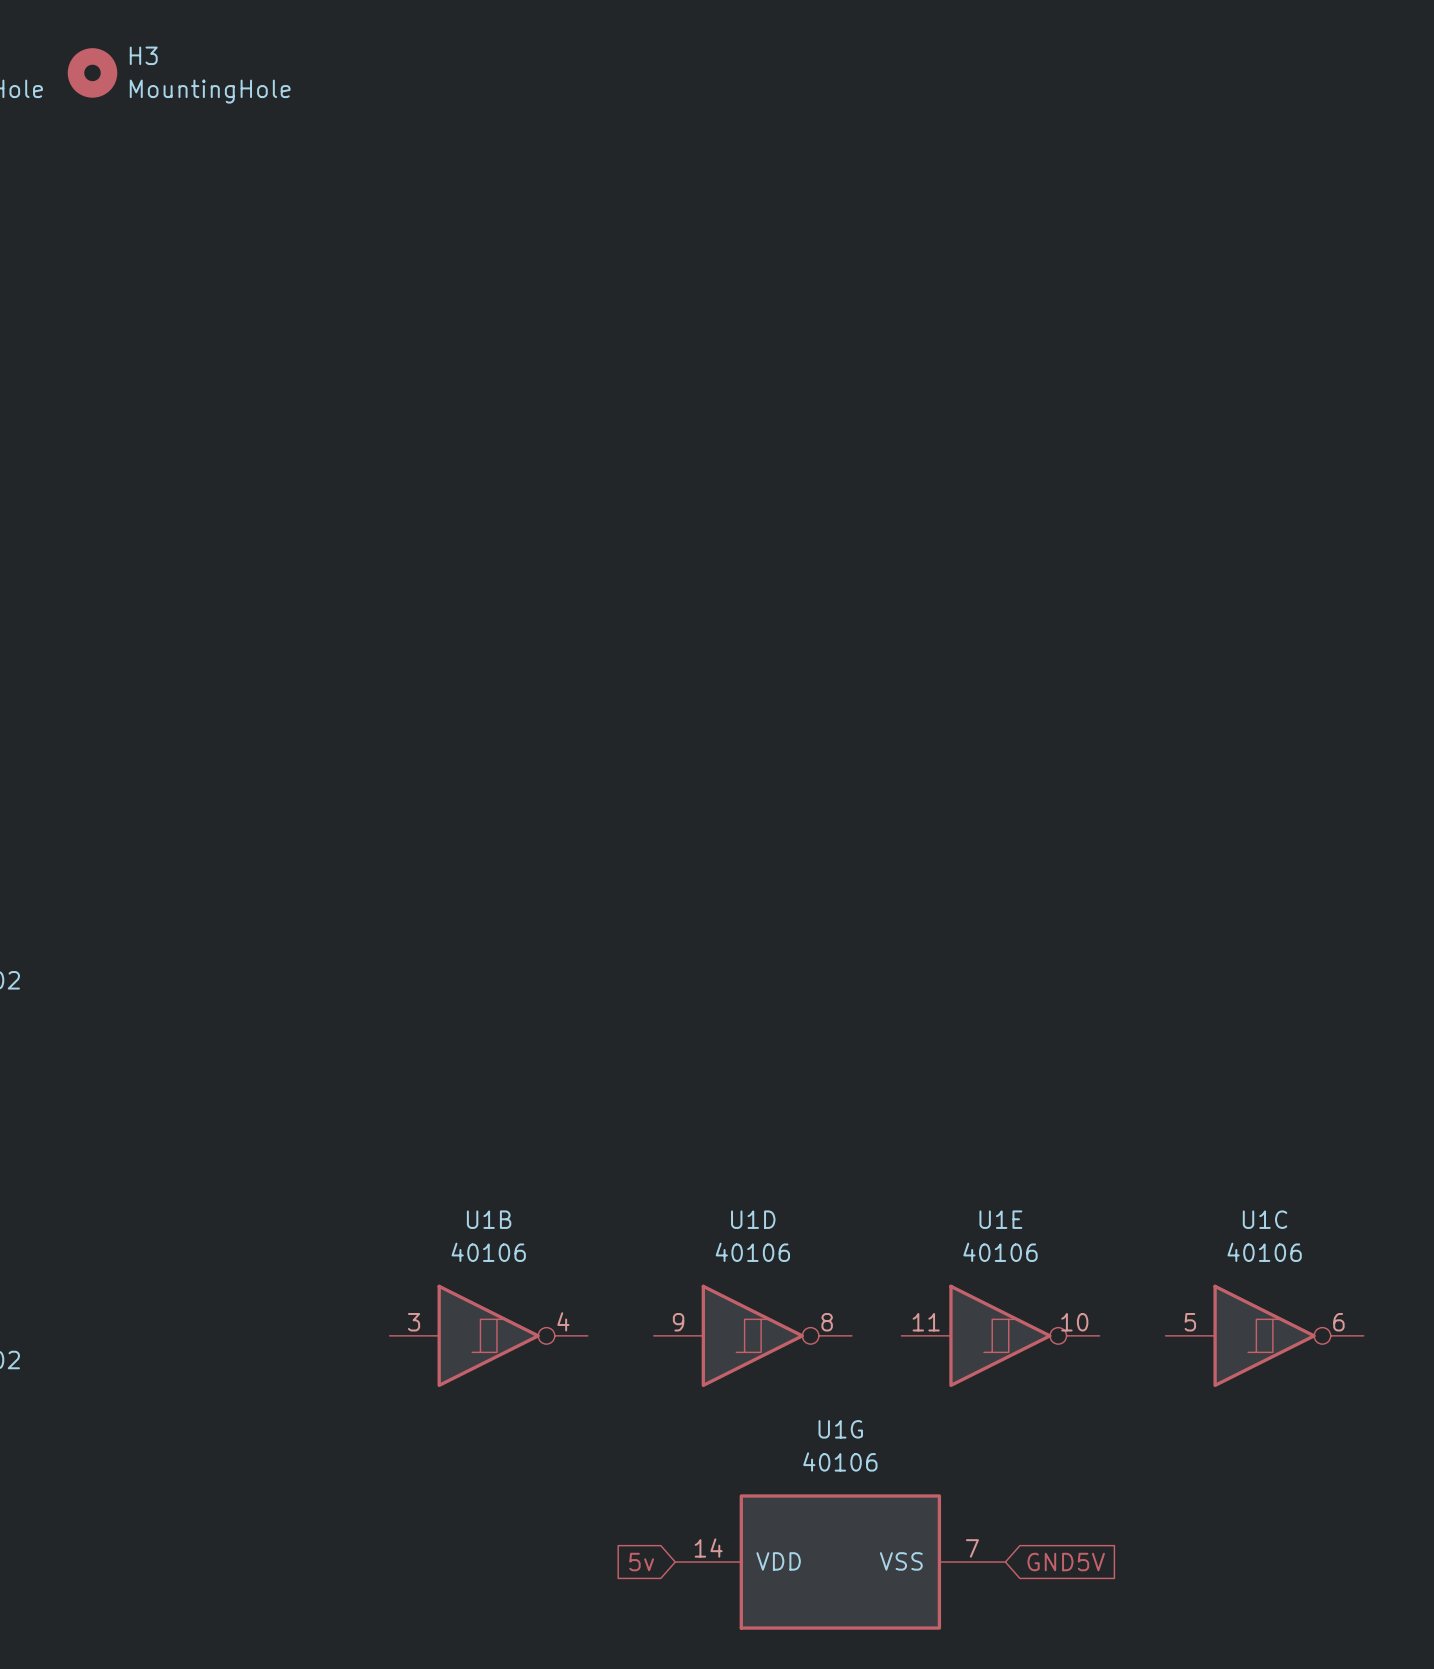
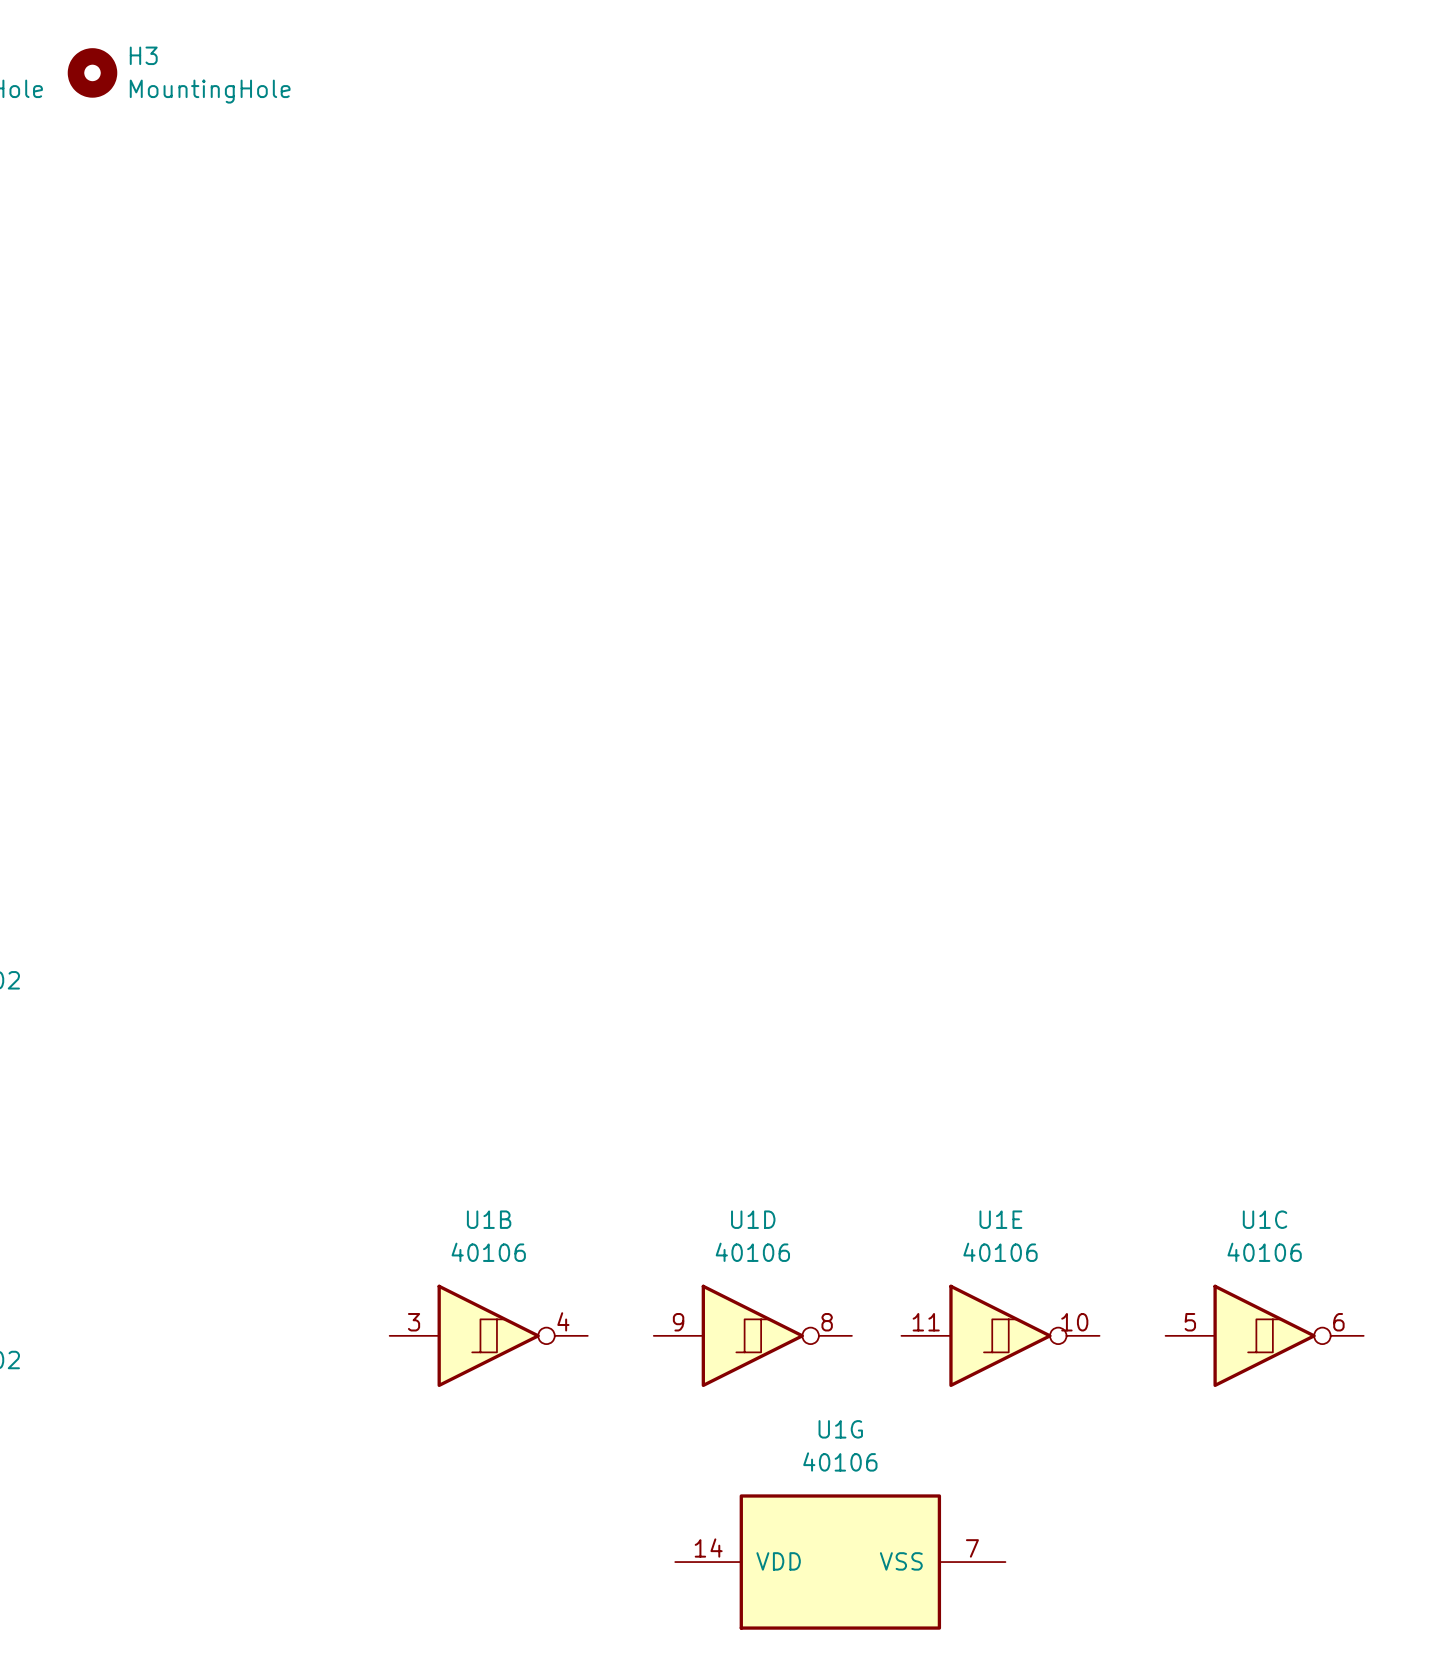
global label: 5v (641, 1562) -> none
global label: GND5V (1066, 1562) -> none

